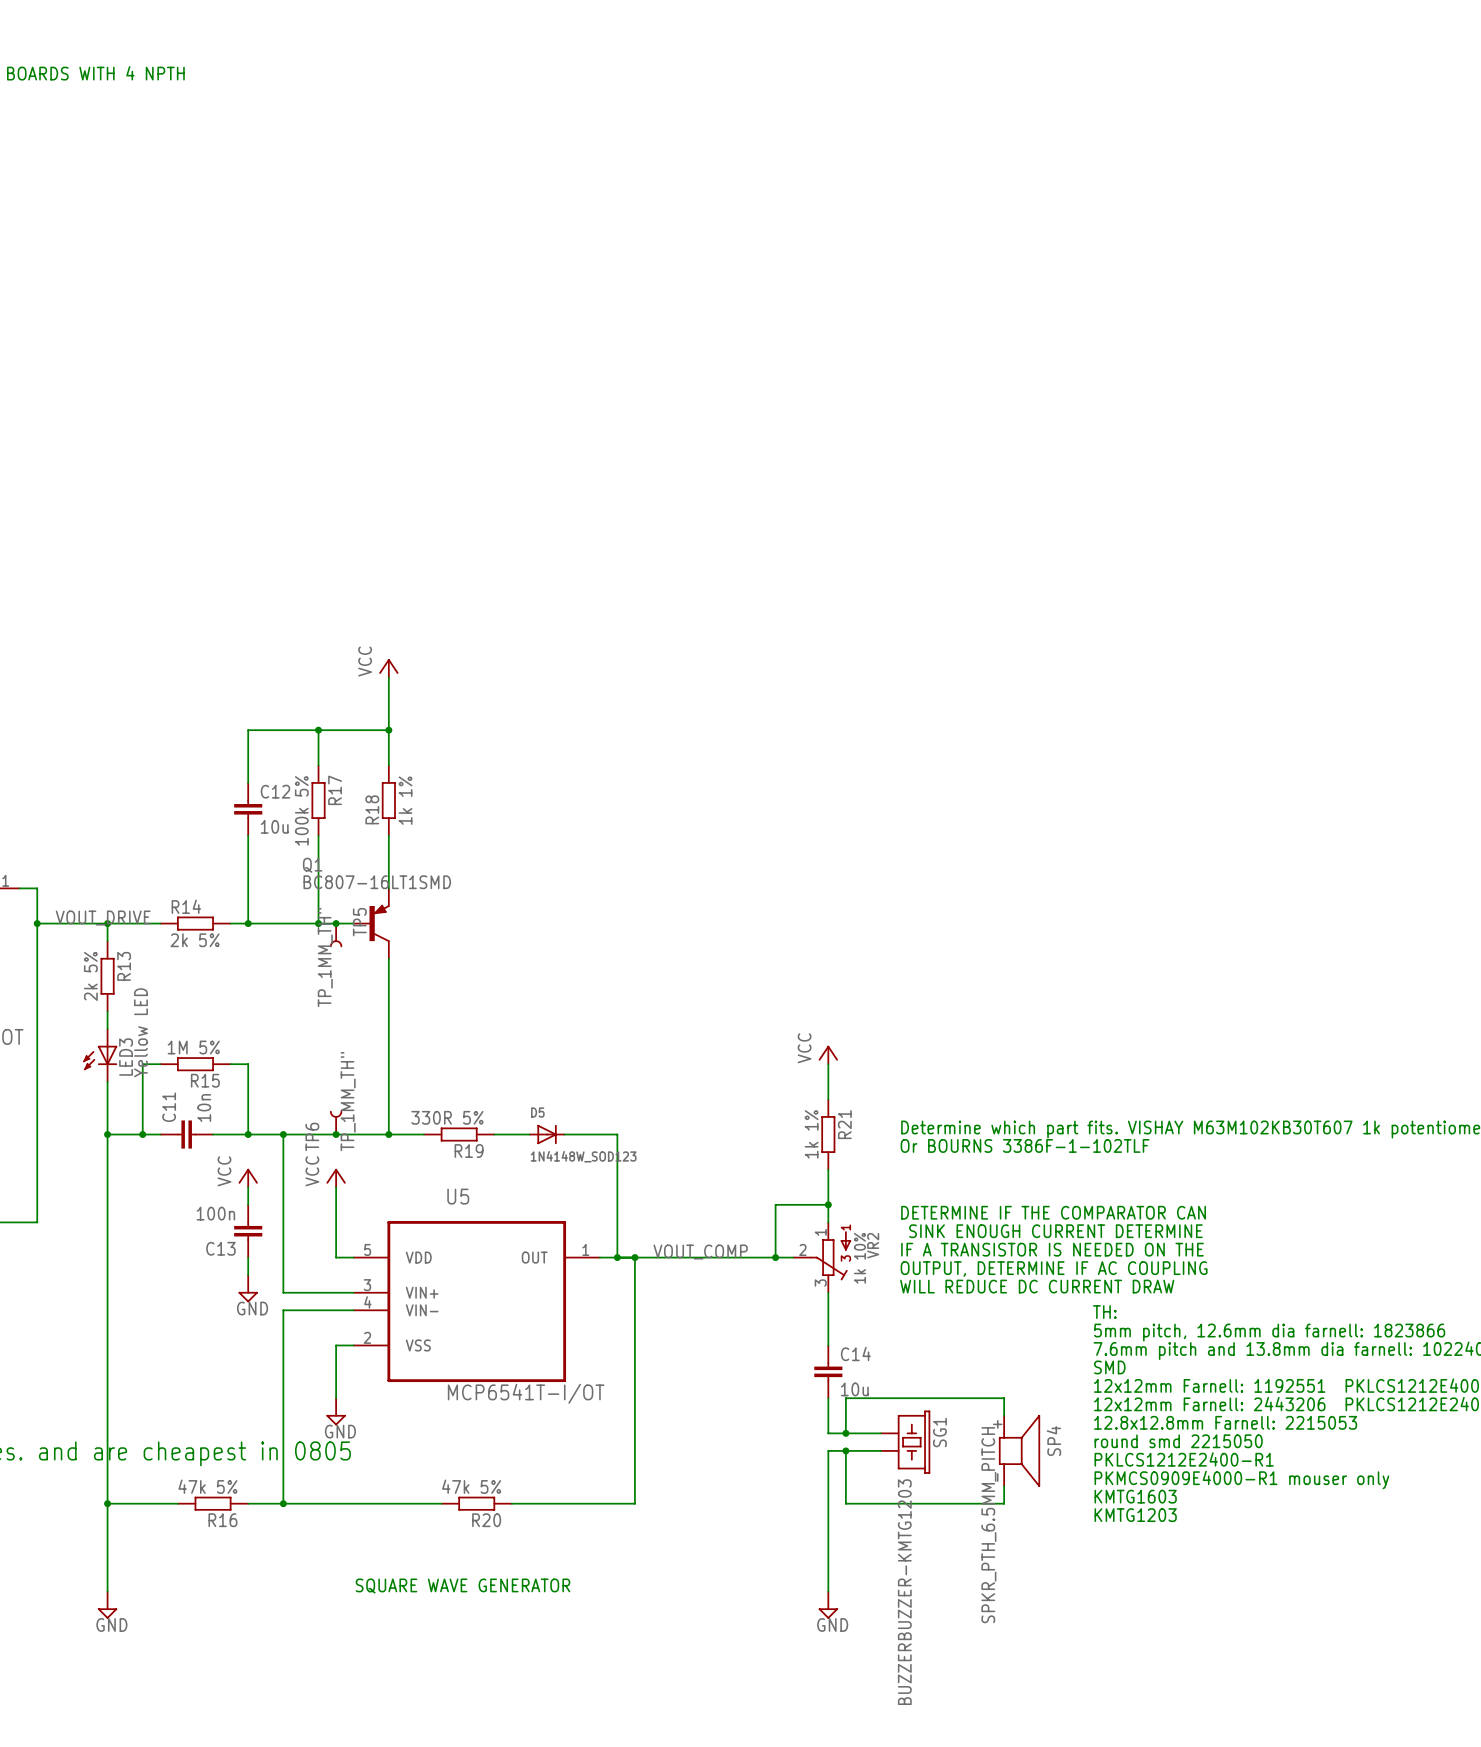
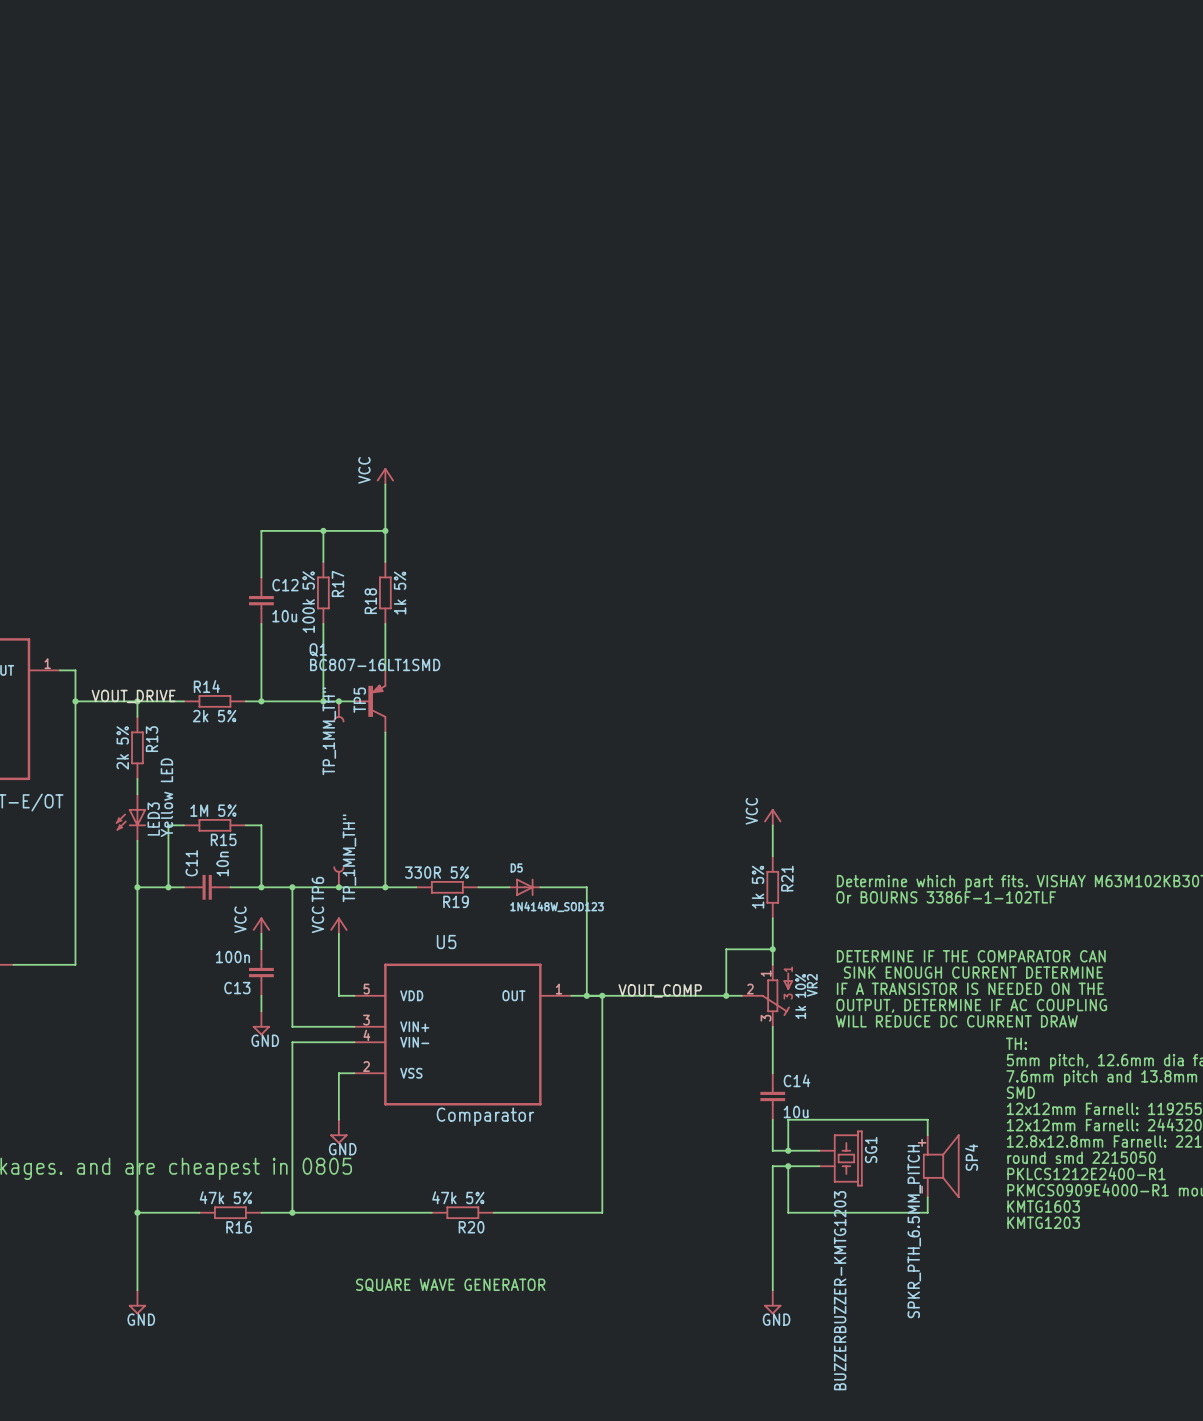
R18 value: 1k 1% (405, 800) -> 1k 5% (400, 593)
R21 value: 1k 1% (811, 1134) -> 1k 5% (758, 887)
U5 value: MCP6541T-I/OT (526, 1393) -> Comparator (485, 1116)

